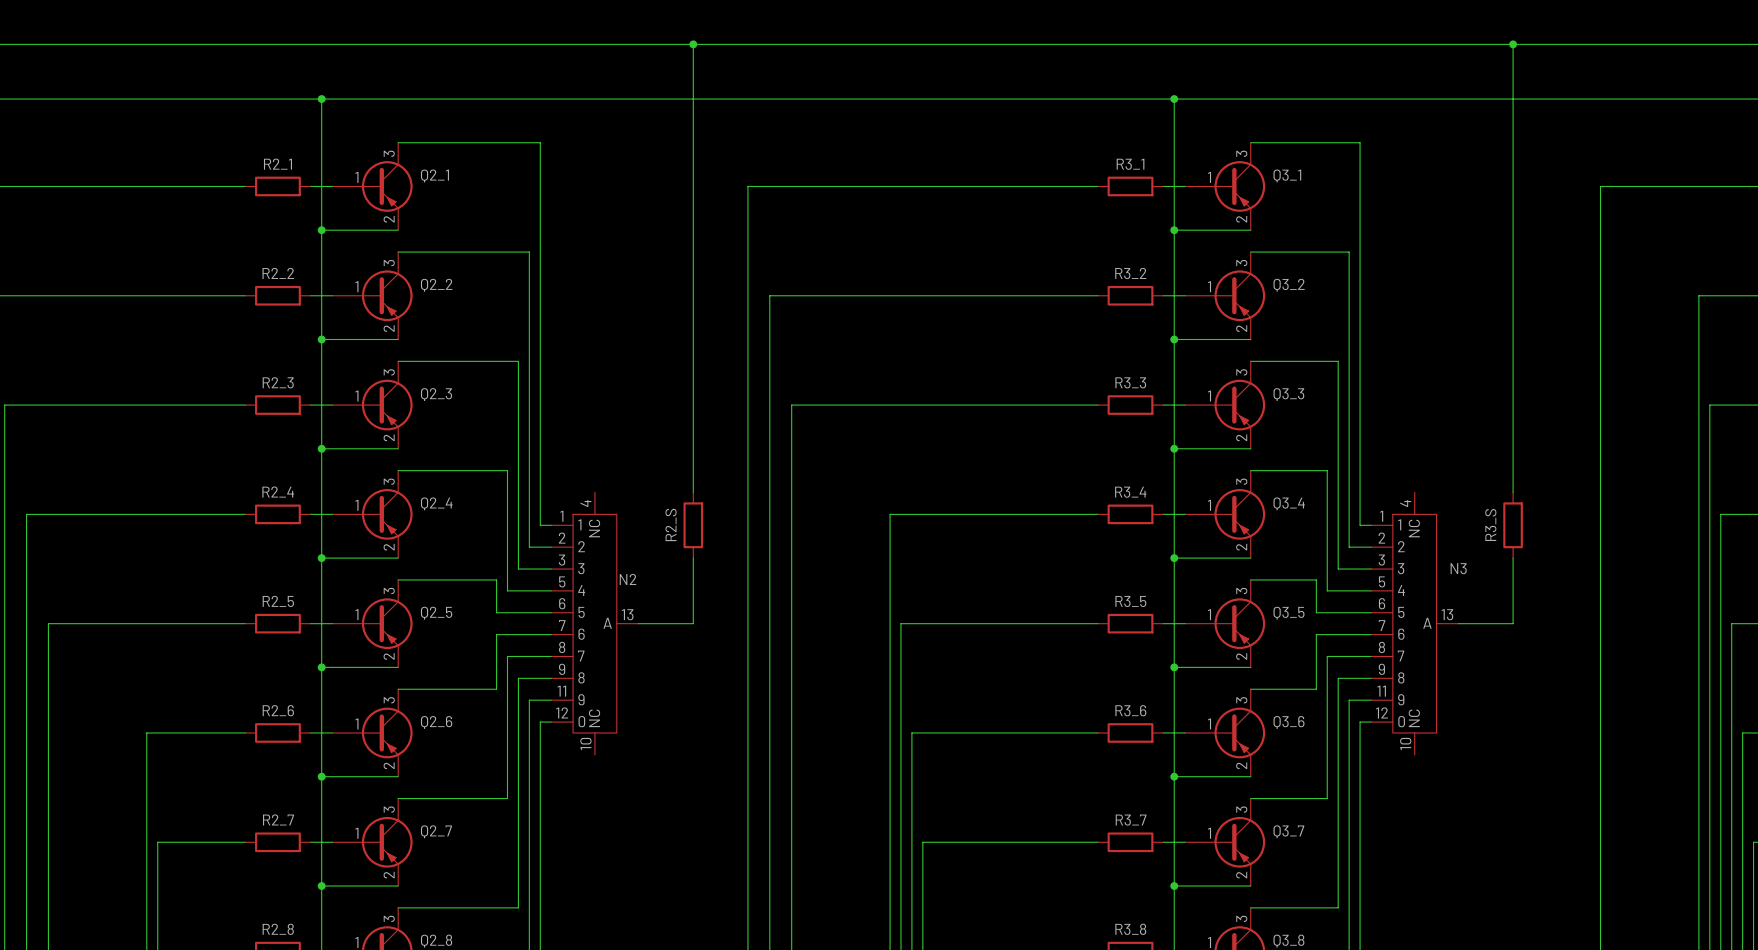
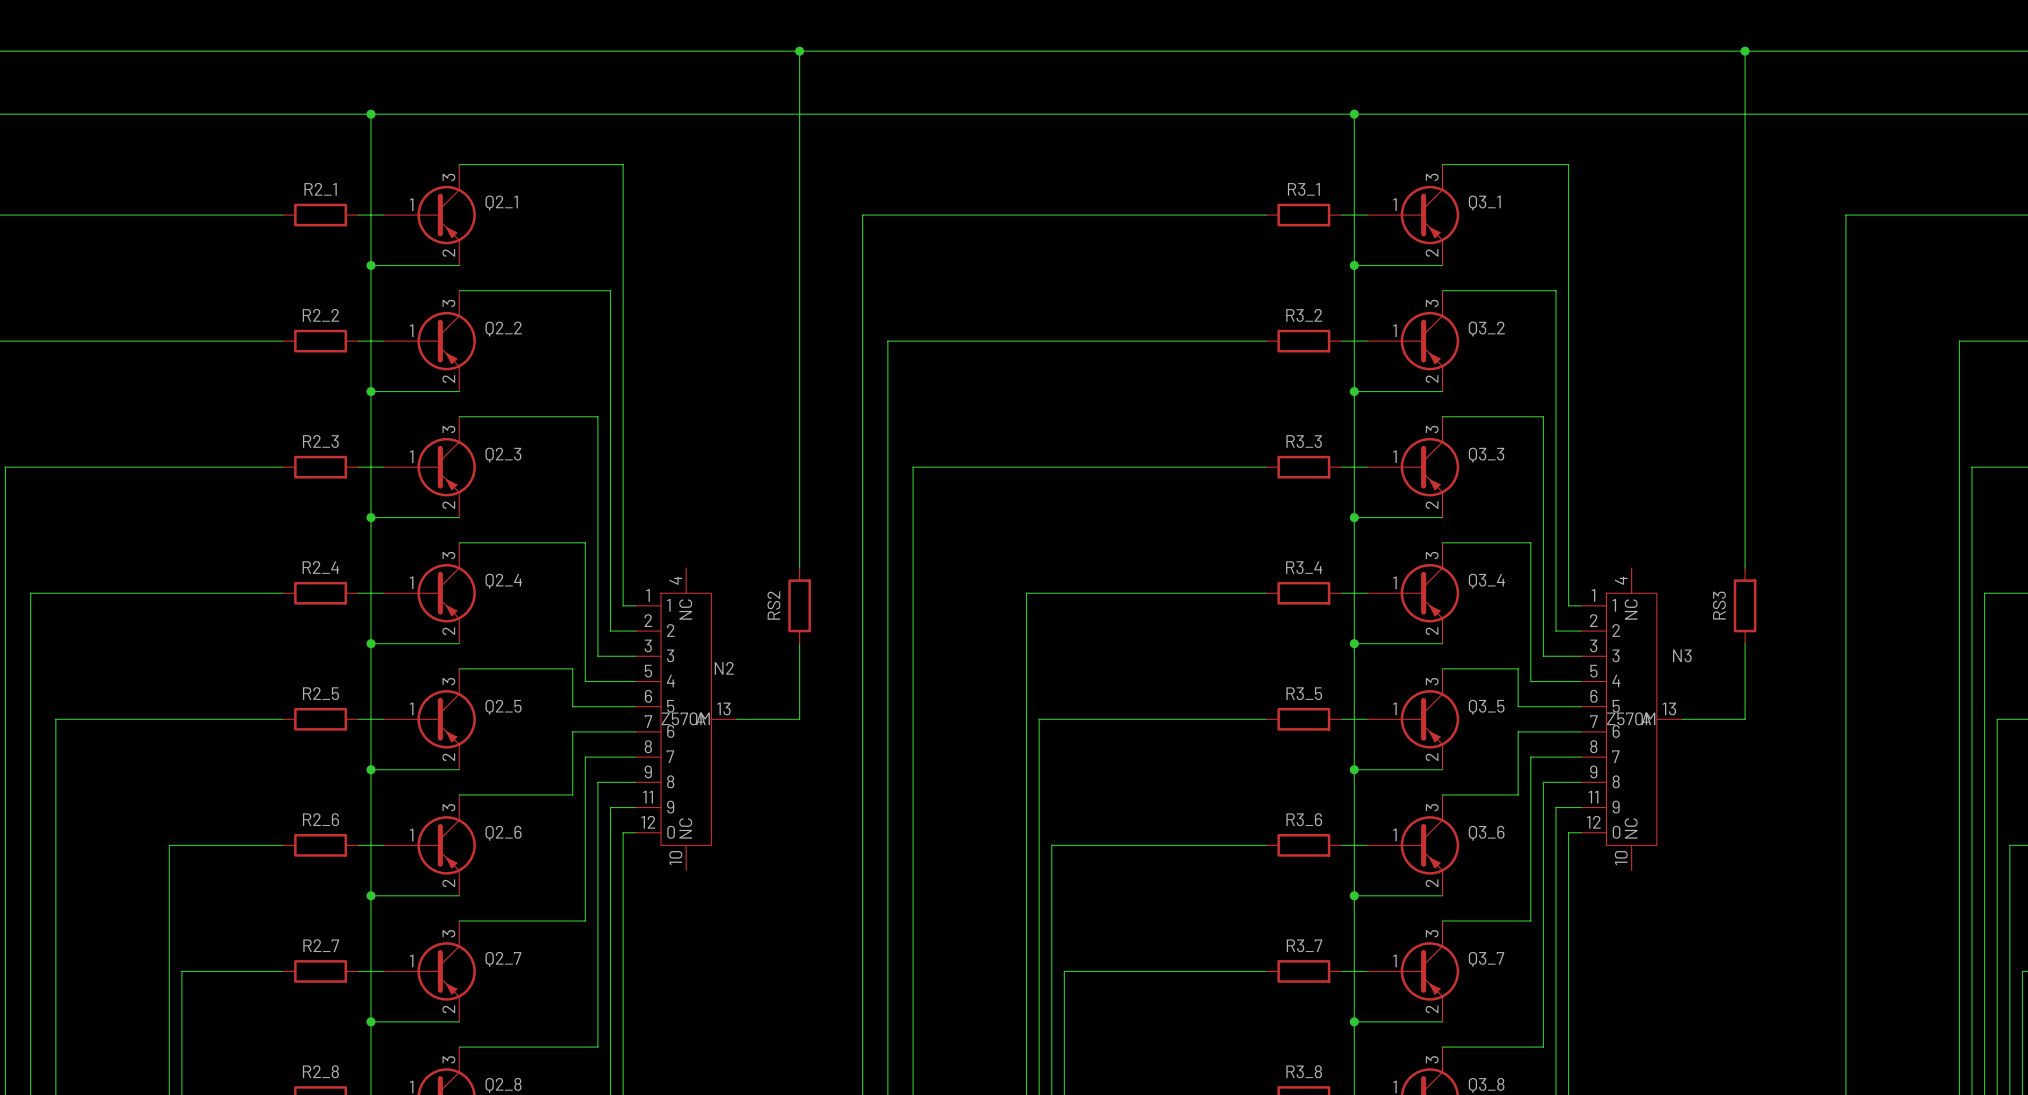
R2_S name: R2_S (671, 524) -> RS2 (773, 605)
R3_S name: R3_S (1490, 524) -> RS3 (1719, 605)
N2 value: none -> Z570M (685, 718)
N3 value: none -> Z570M (1631, 718)

